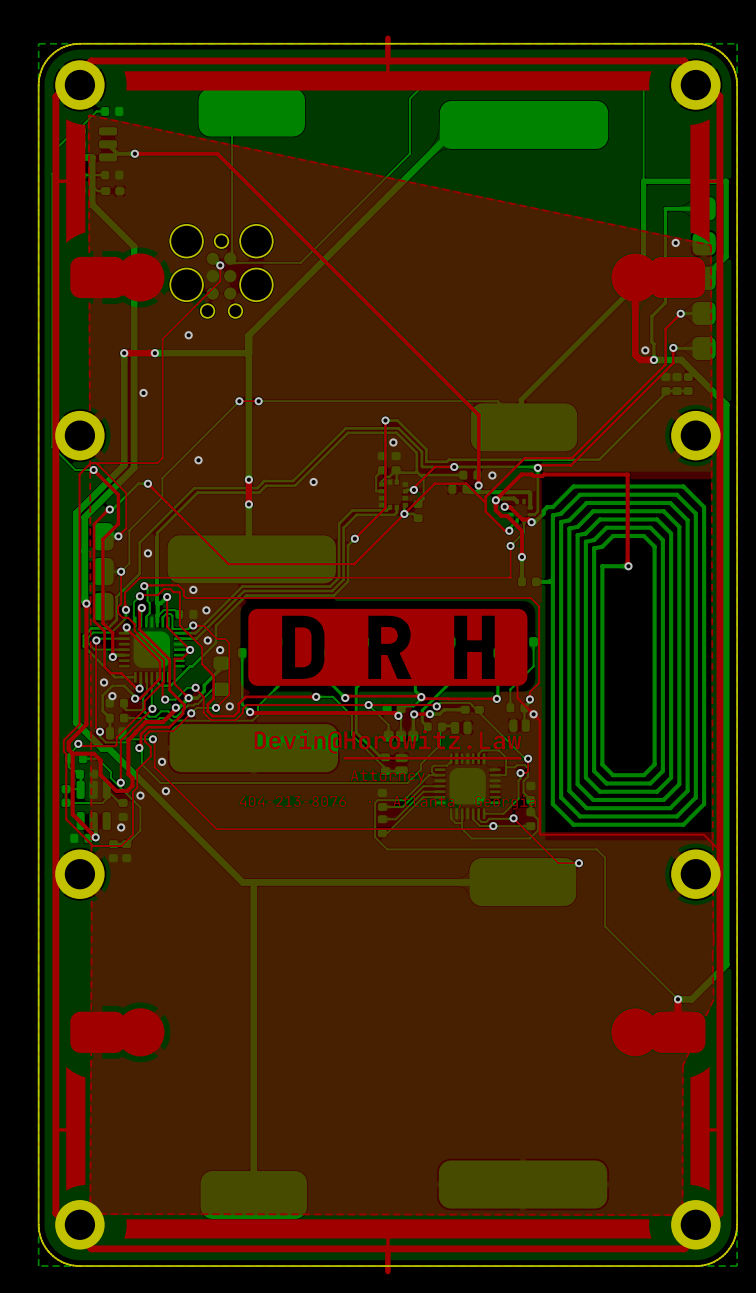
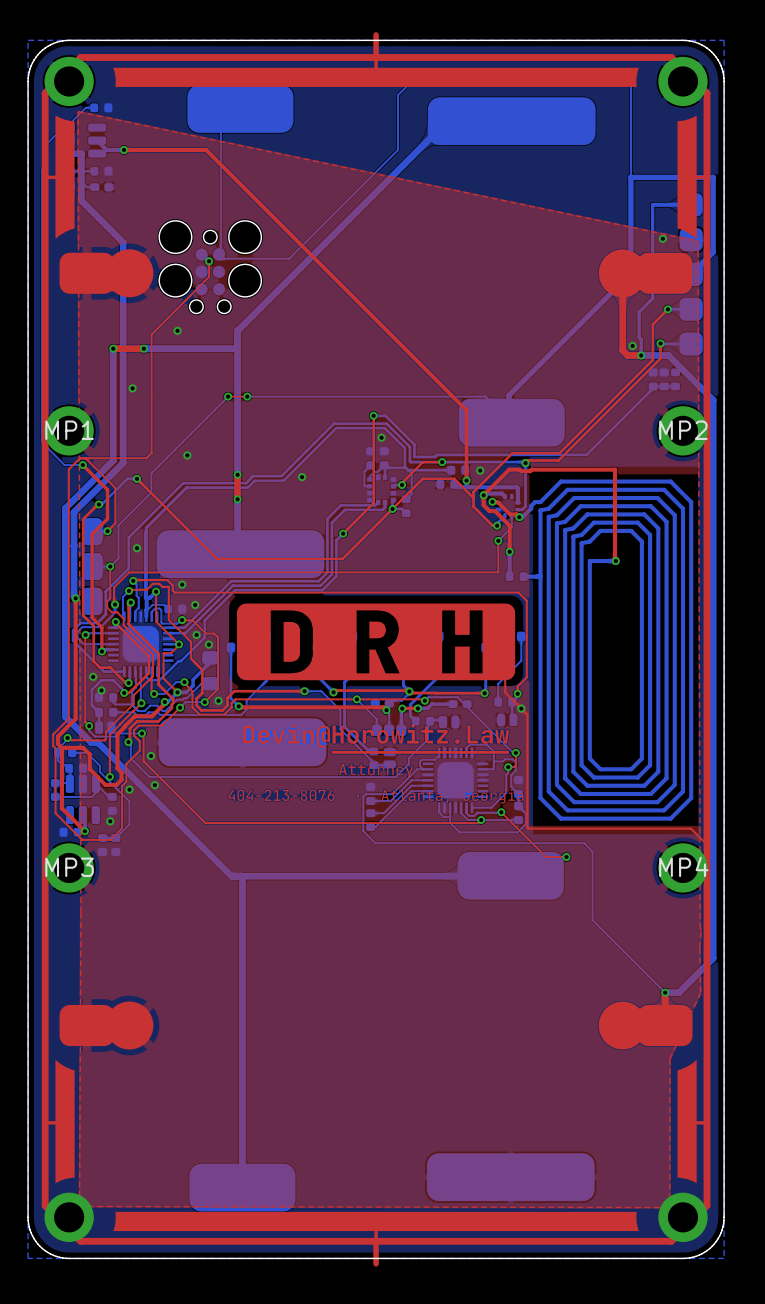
MP1 name: none -> MP1 (69, 430)
MP2 name: none -> MP2 (683, 430)
MP3 name: none -> MP3 (69, 867)
MP4 name: none -> MP4 (683, 866)

